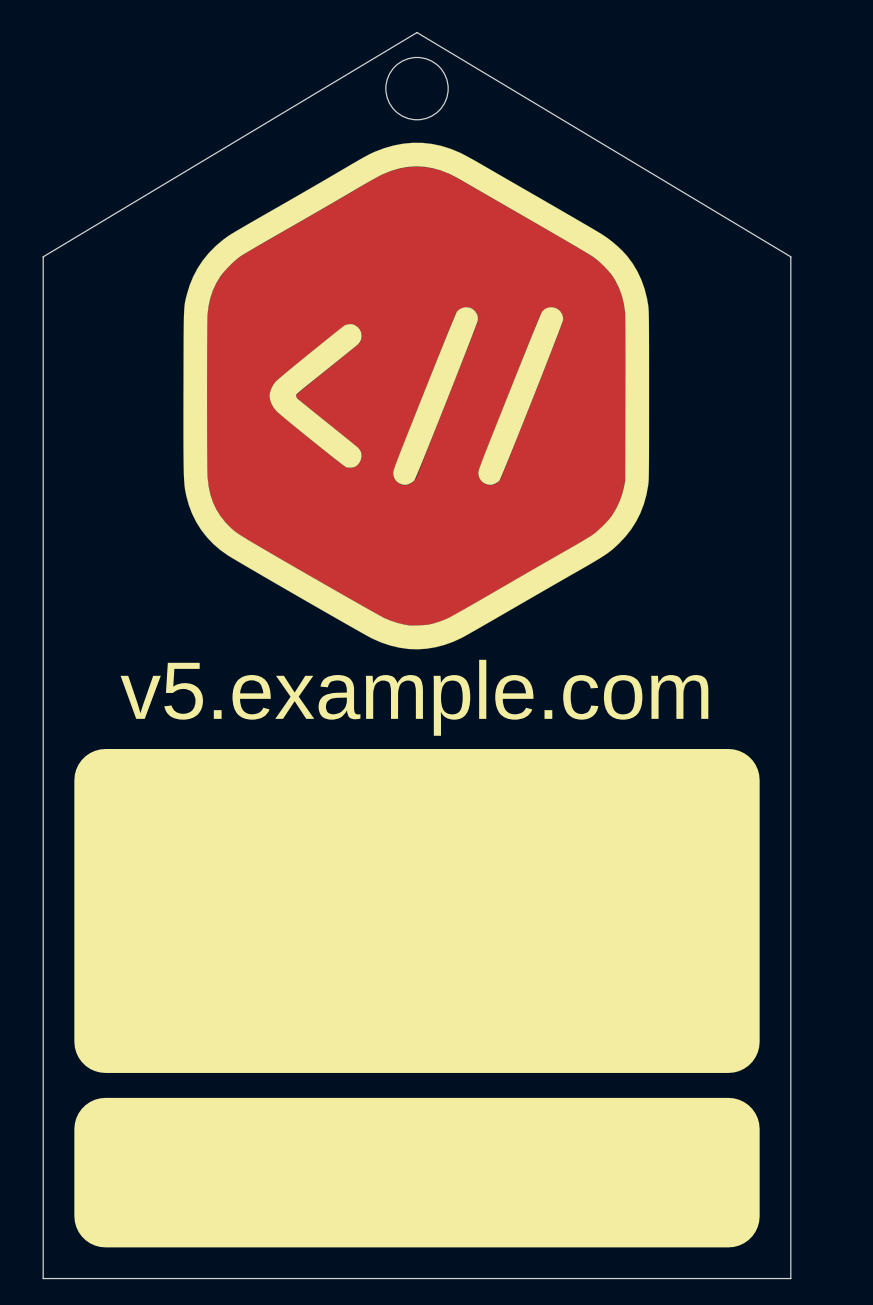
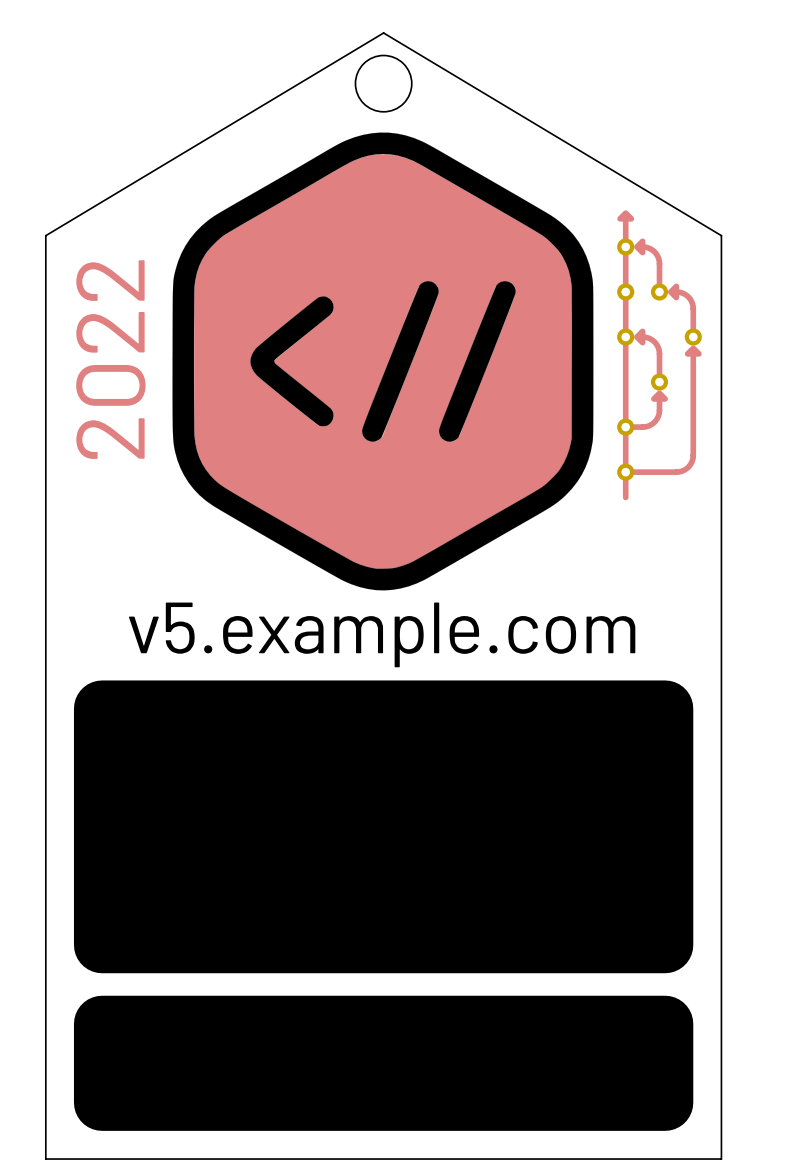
part: none -> (659, 355)
text: none -> 2022 (110, 359)

